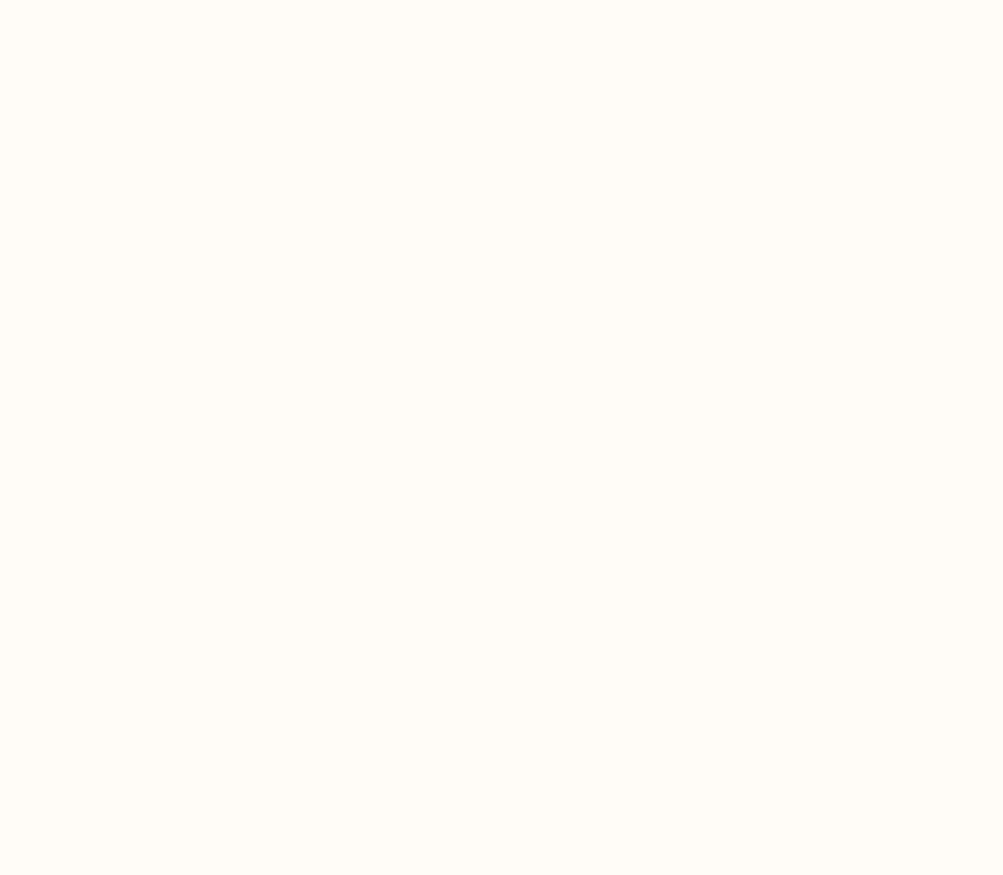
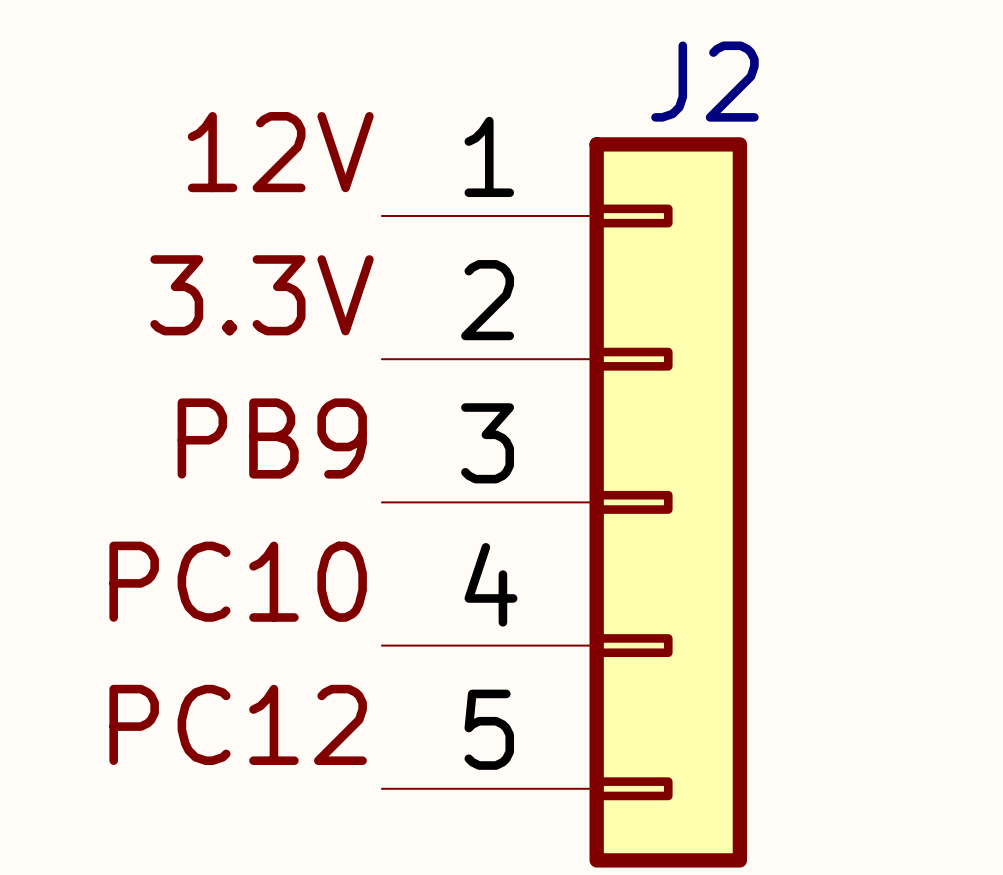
label: none -> 12V (280, 152)
label: none -> 3.3V (262, 295)
label: none -> PB9 (272, 438)
J2: none -> (564, 502)
label: none -> PC10 (238, 581)
label: none -> PC12 (238, 724)

